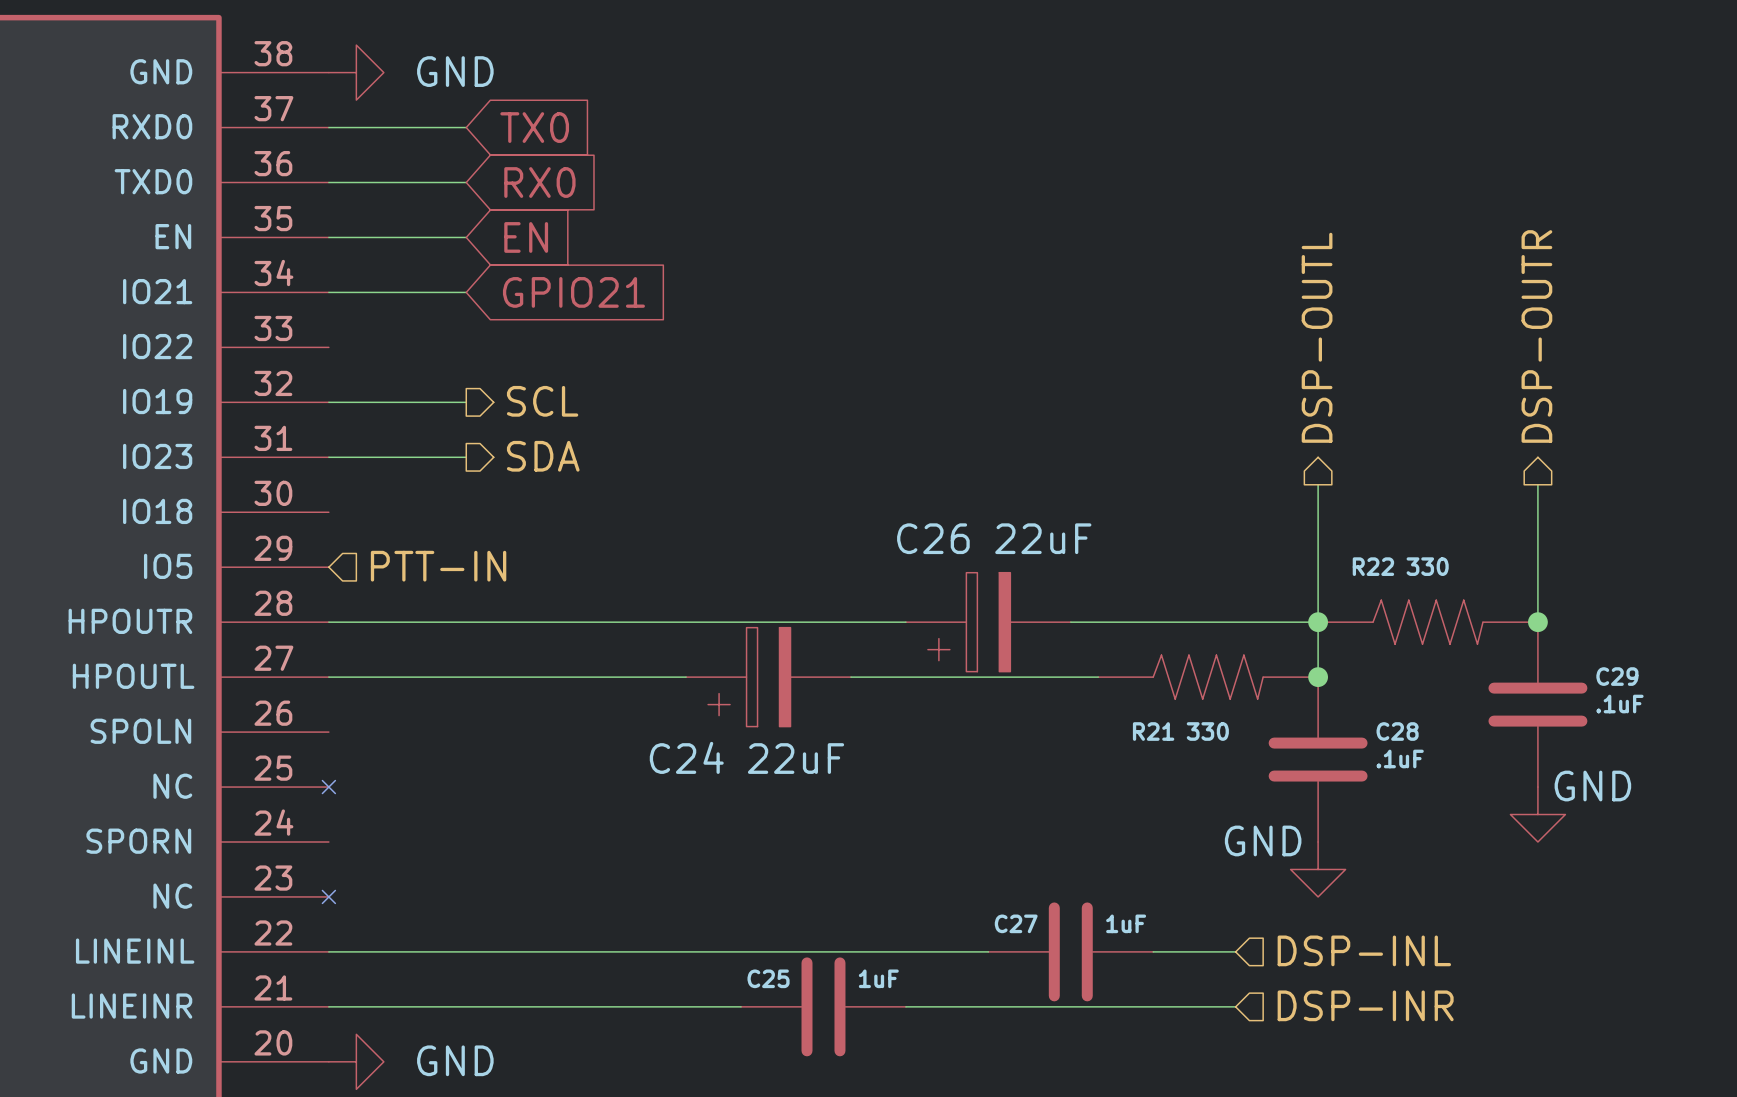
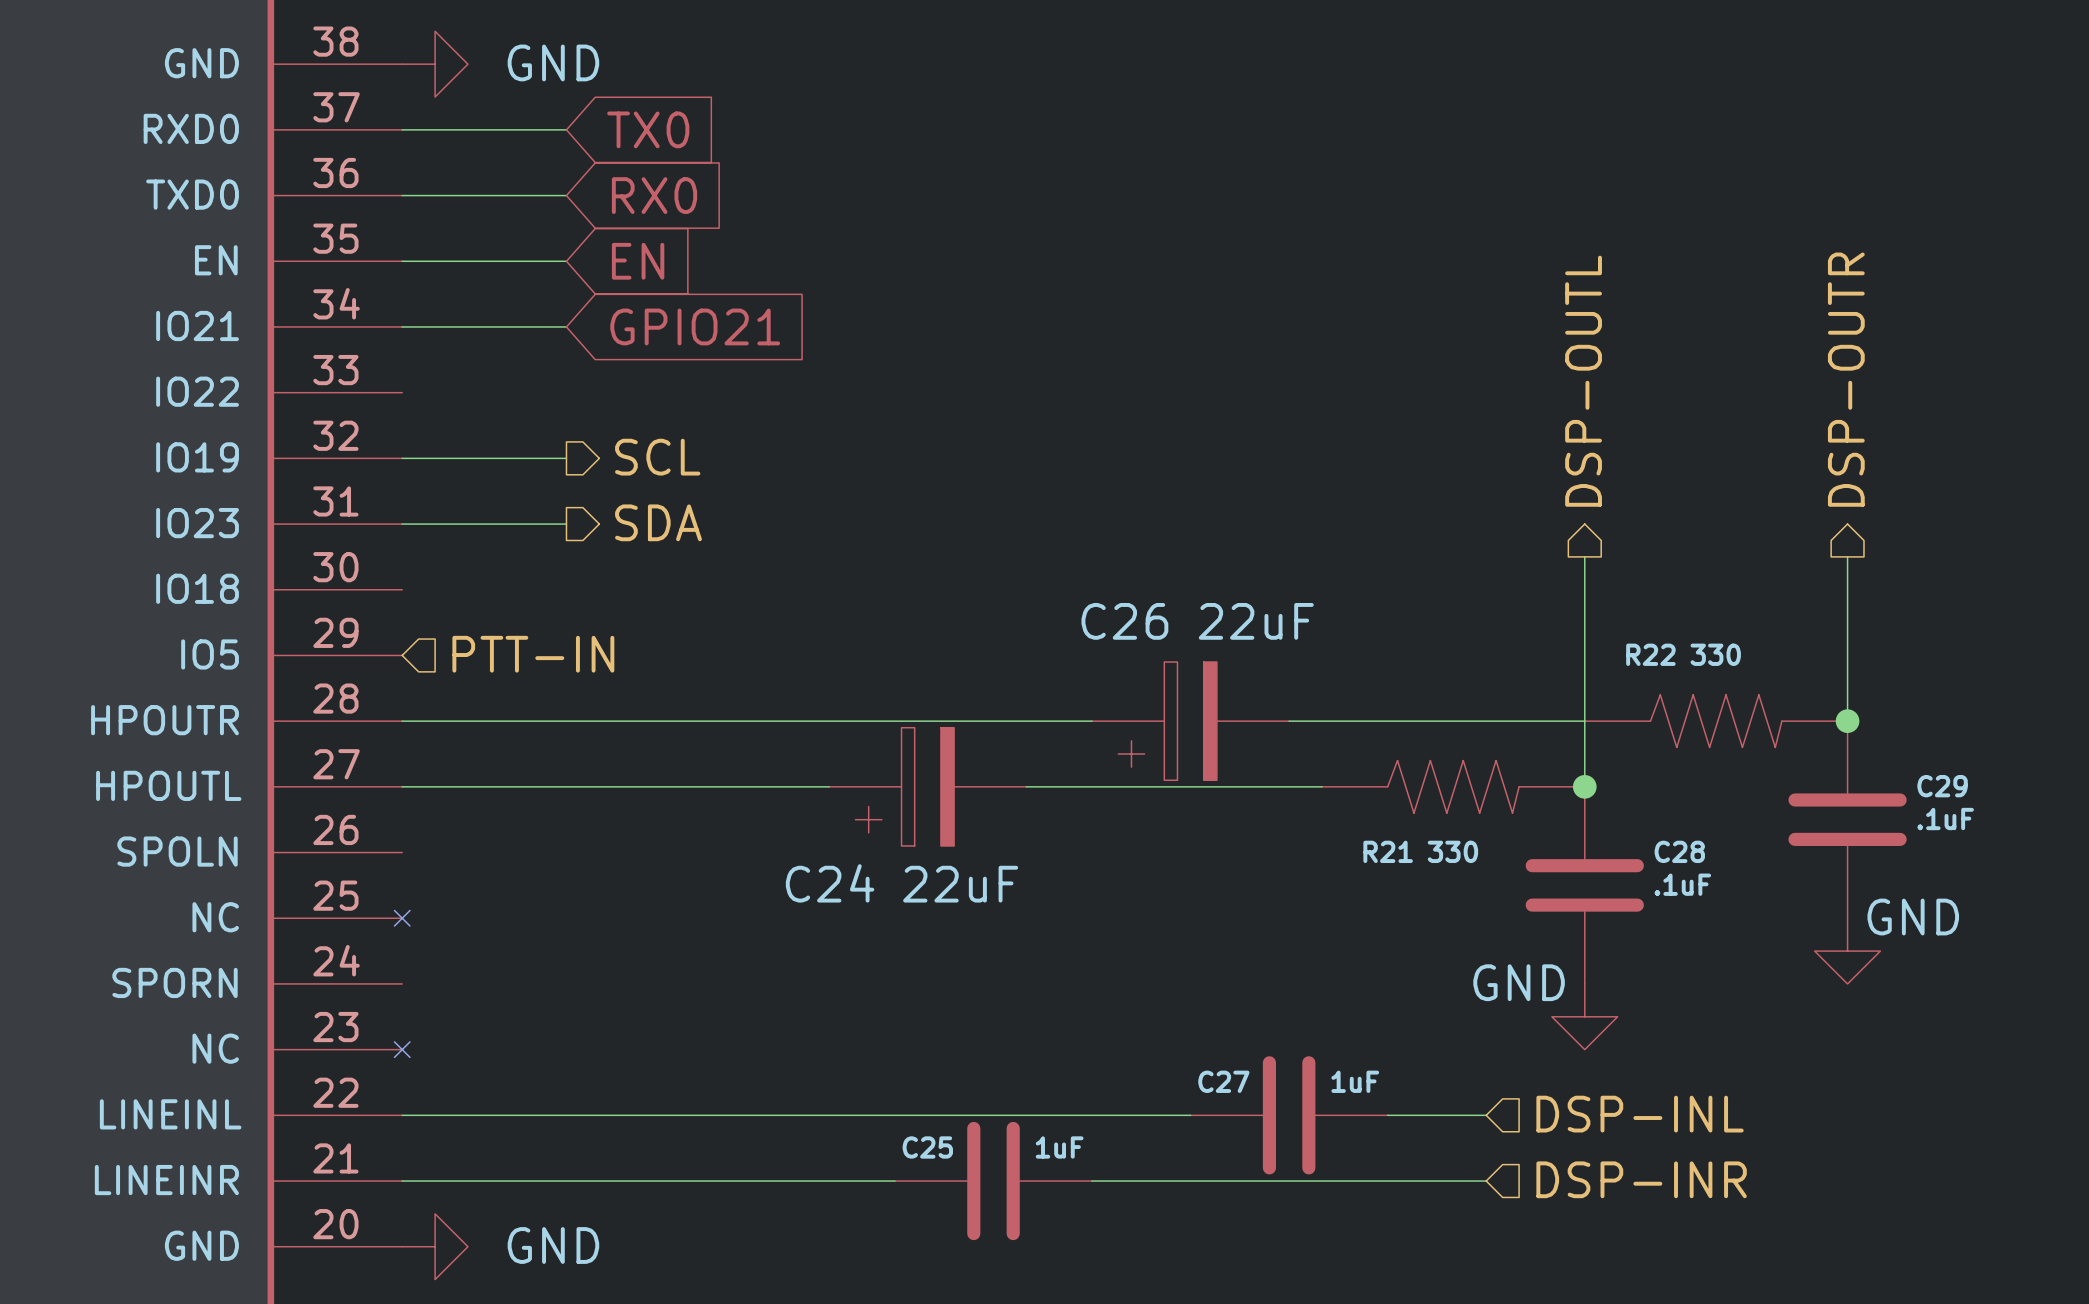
junction: (1318, 622) -> none

